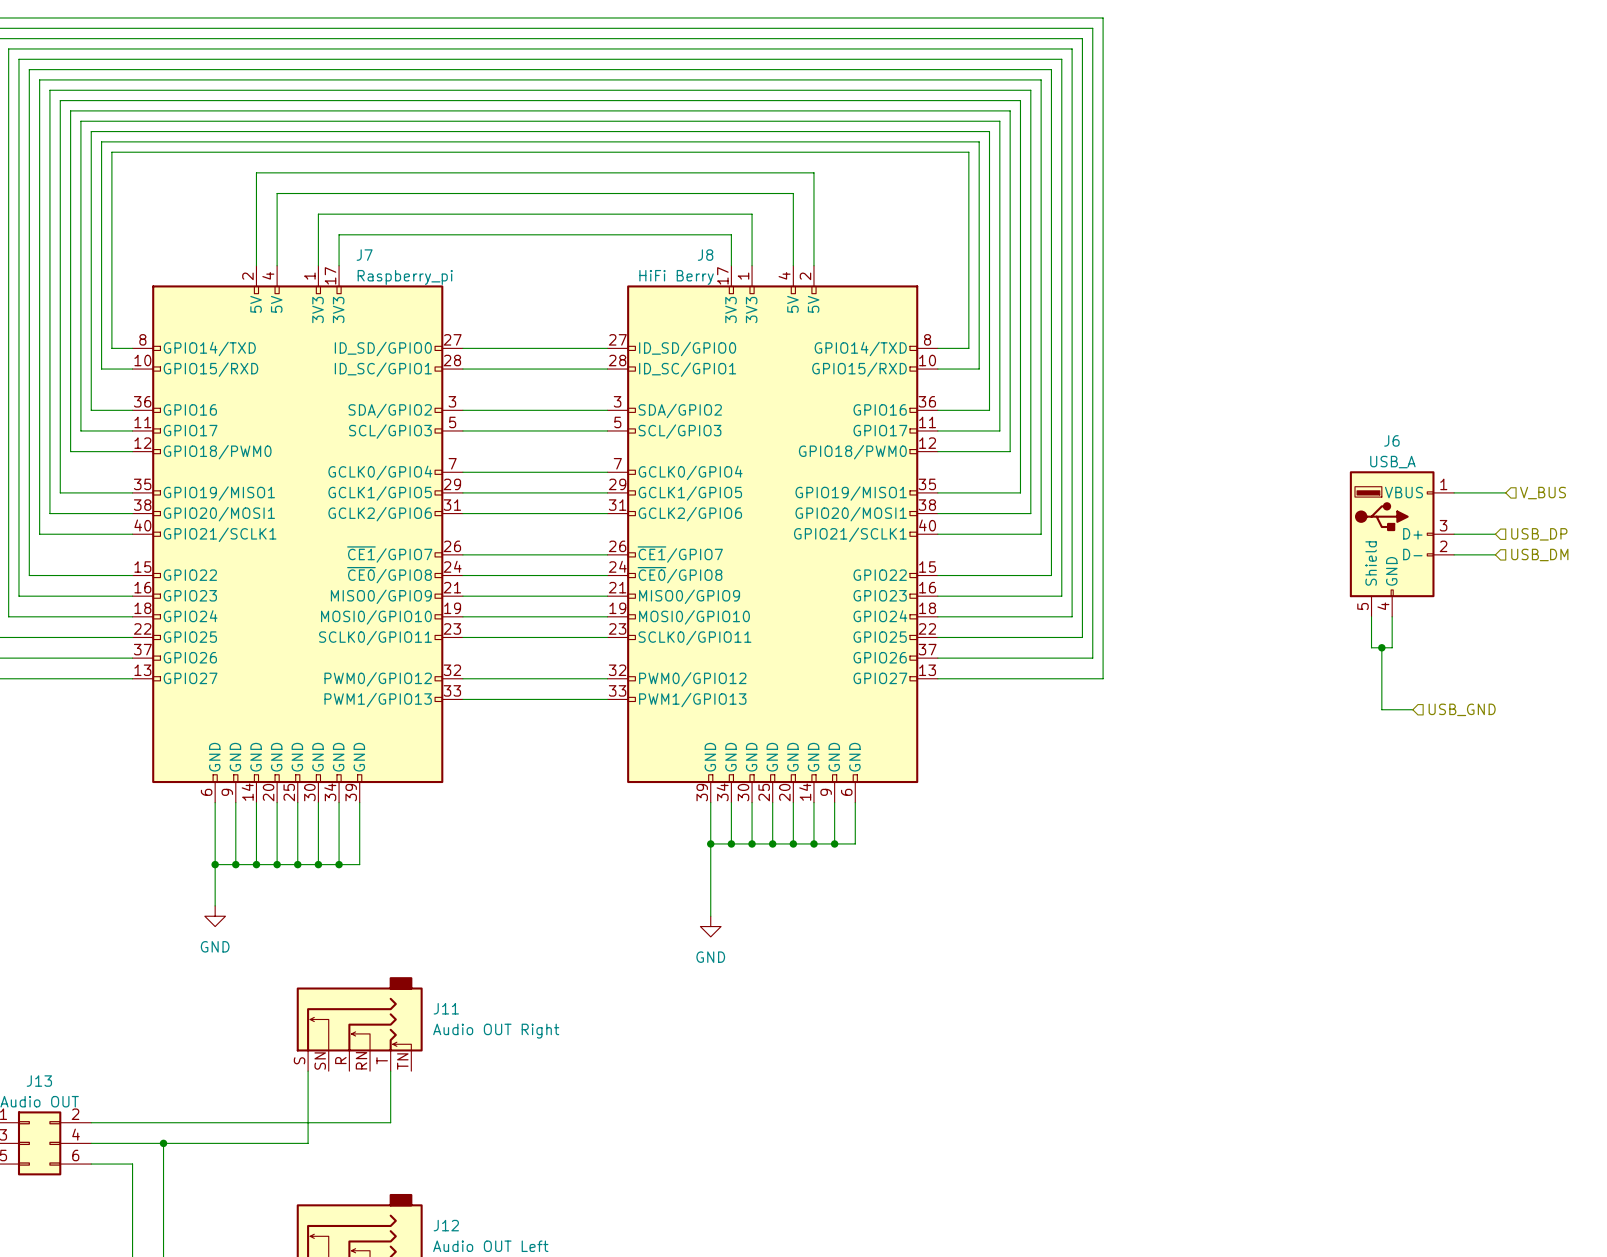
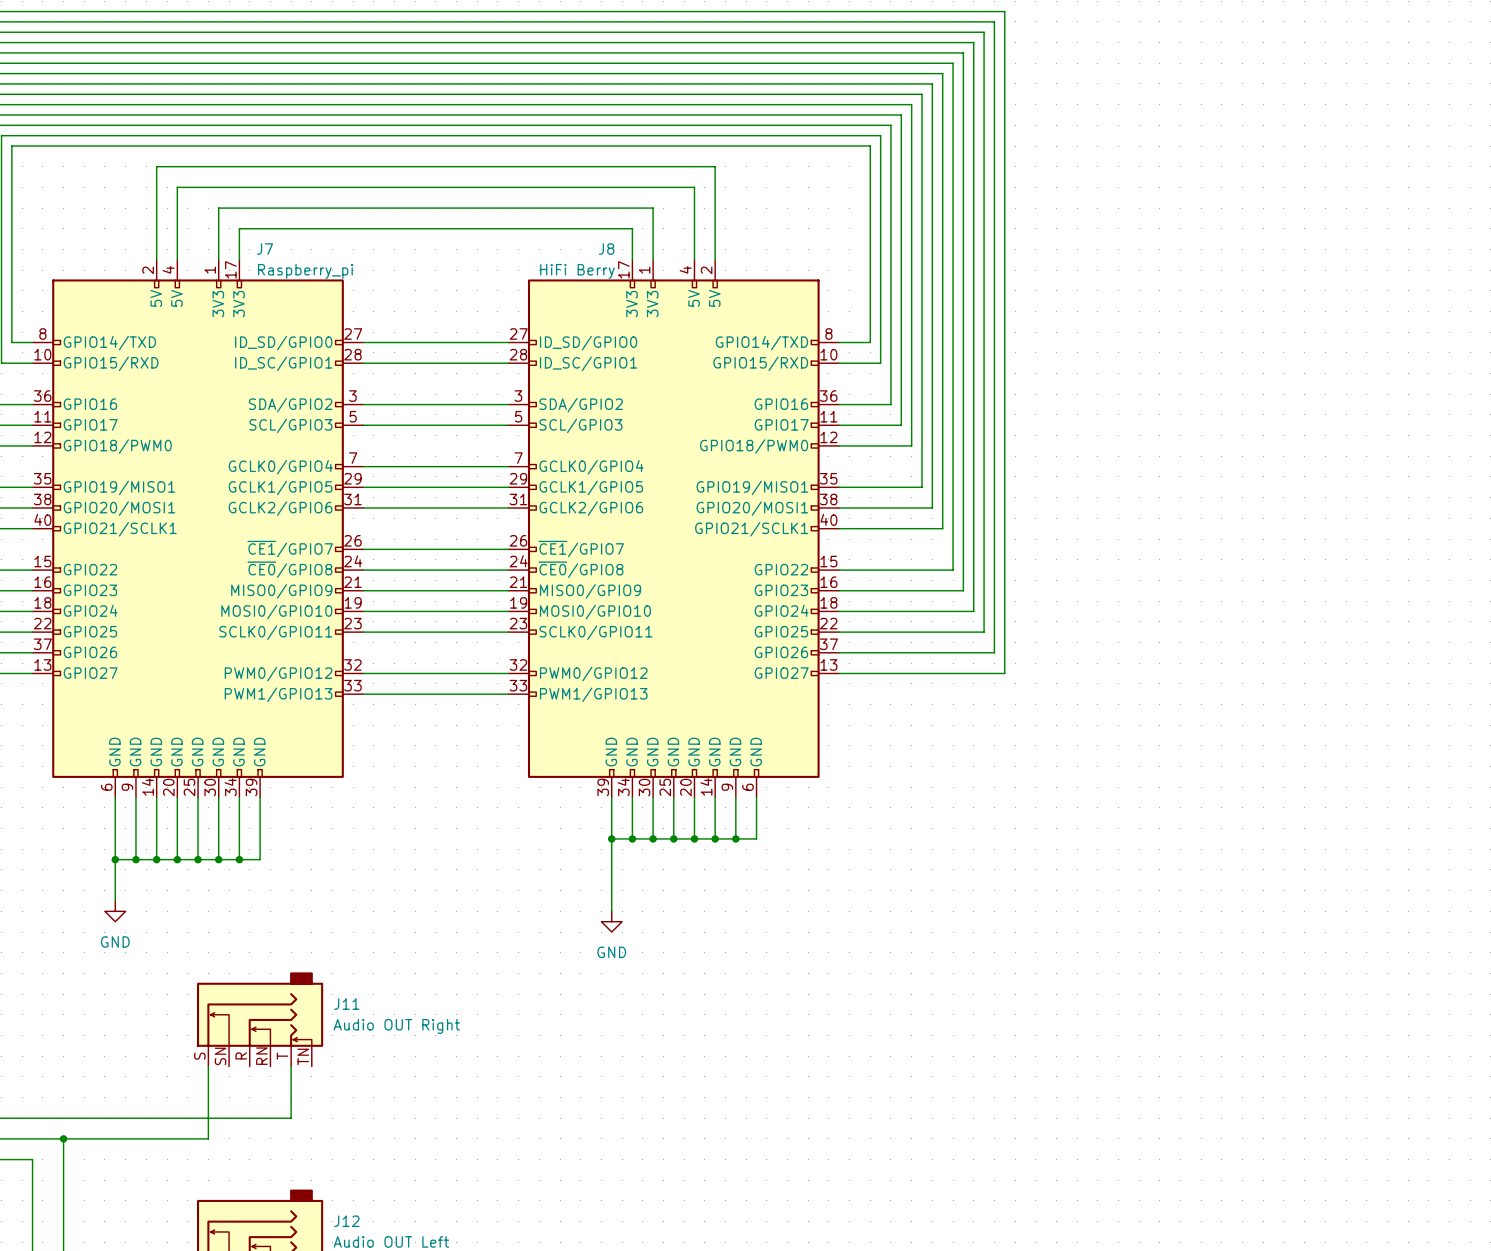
wire: (1454, 492) (1505, 492) -> none
hierarchical label: V_BUS (1543, 493) -> none
wire: (1454, 534) (1495, 534) -> none
hierarchical label: USB_DP (1539, 534) -> none
J6: USB_A (1401, 544) -> none
wire: (1454, 554) (1495, 554) -> none
hierarchical label: USB_DM (1539, 554) -> none
wire: (1371, 616) (1371, 647) (1392, 647) (1392, 616) -> none
wire: (1381, 647) (1381, 709) (1412, 709) -> none
junction: (1381, 647) -> none
hierarchical label: USB_GND (1462, 709) -> none

